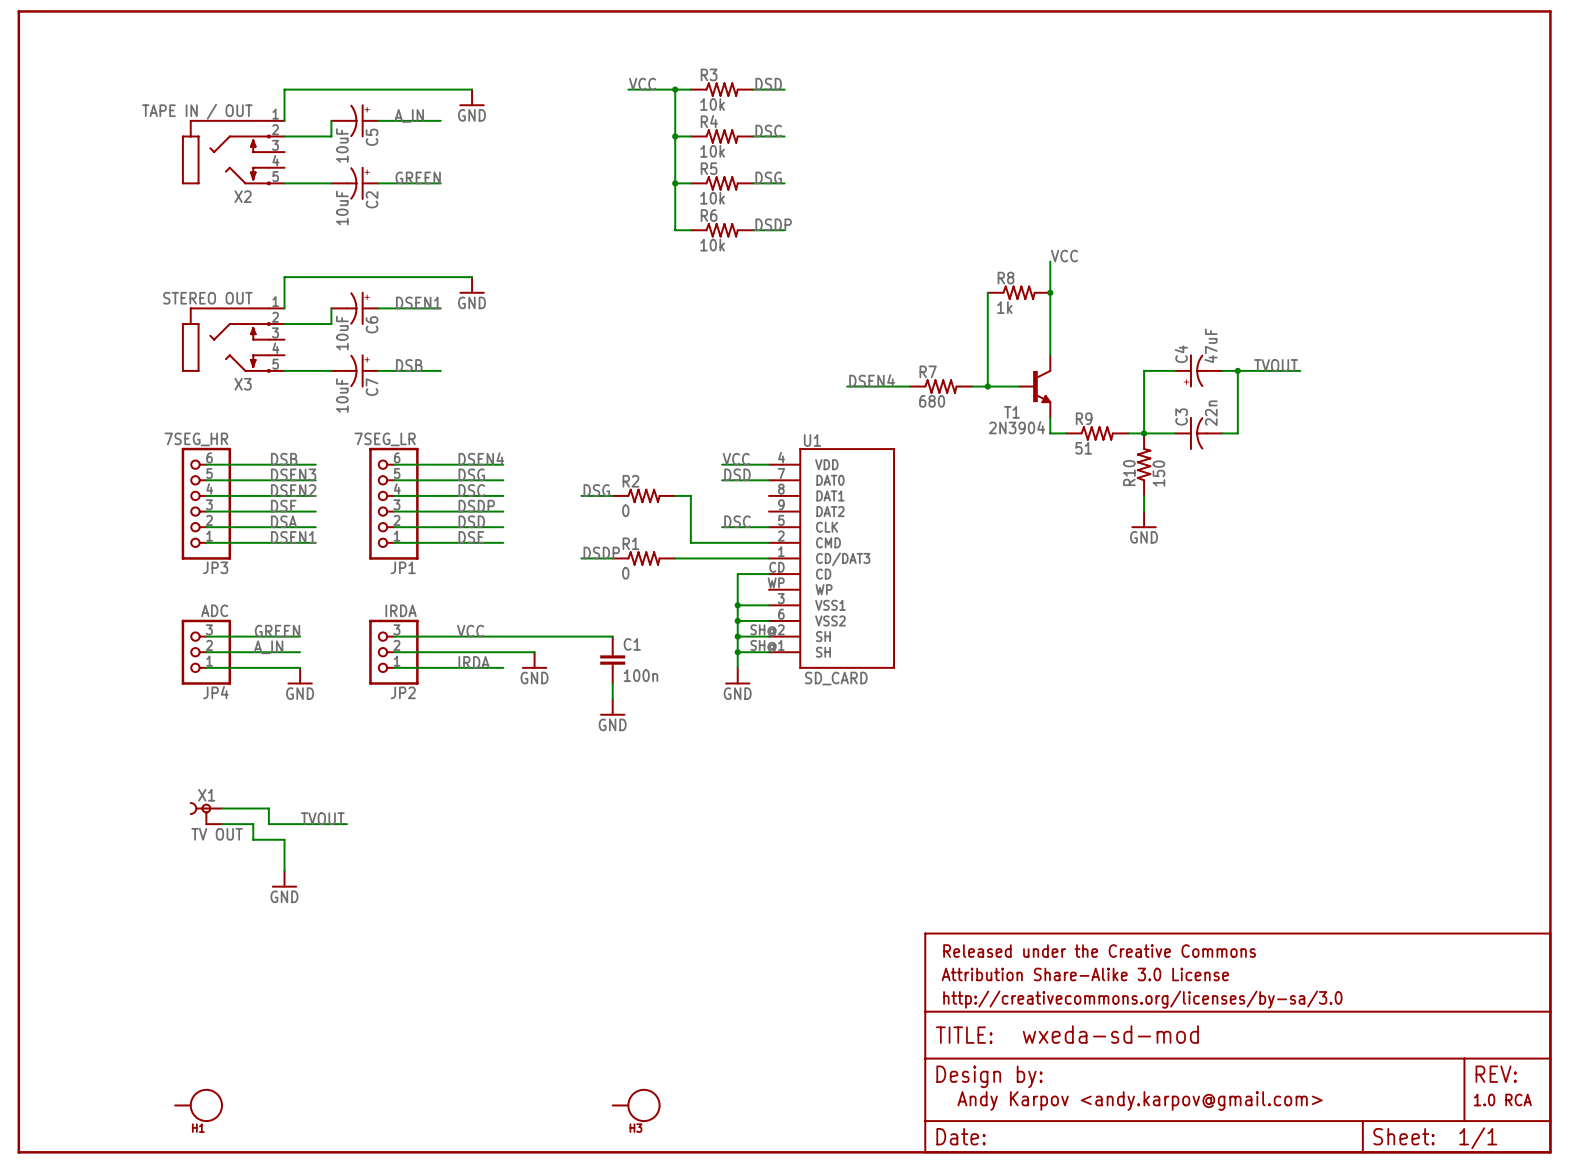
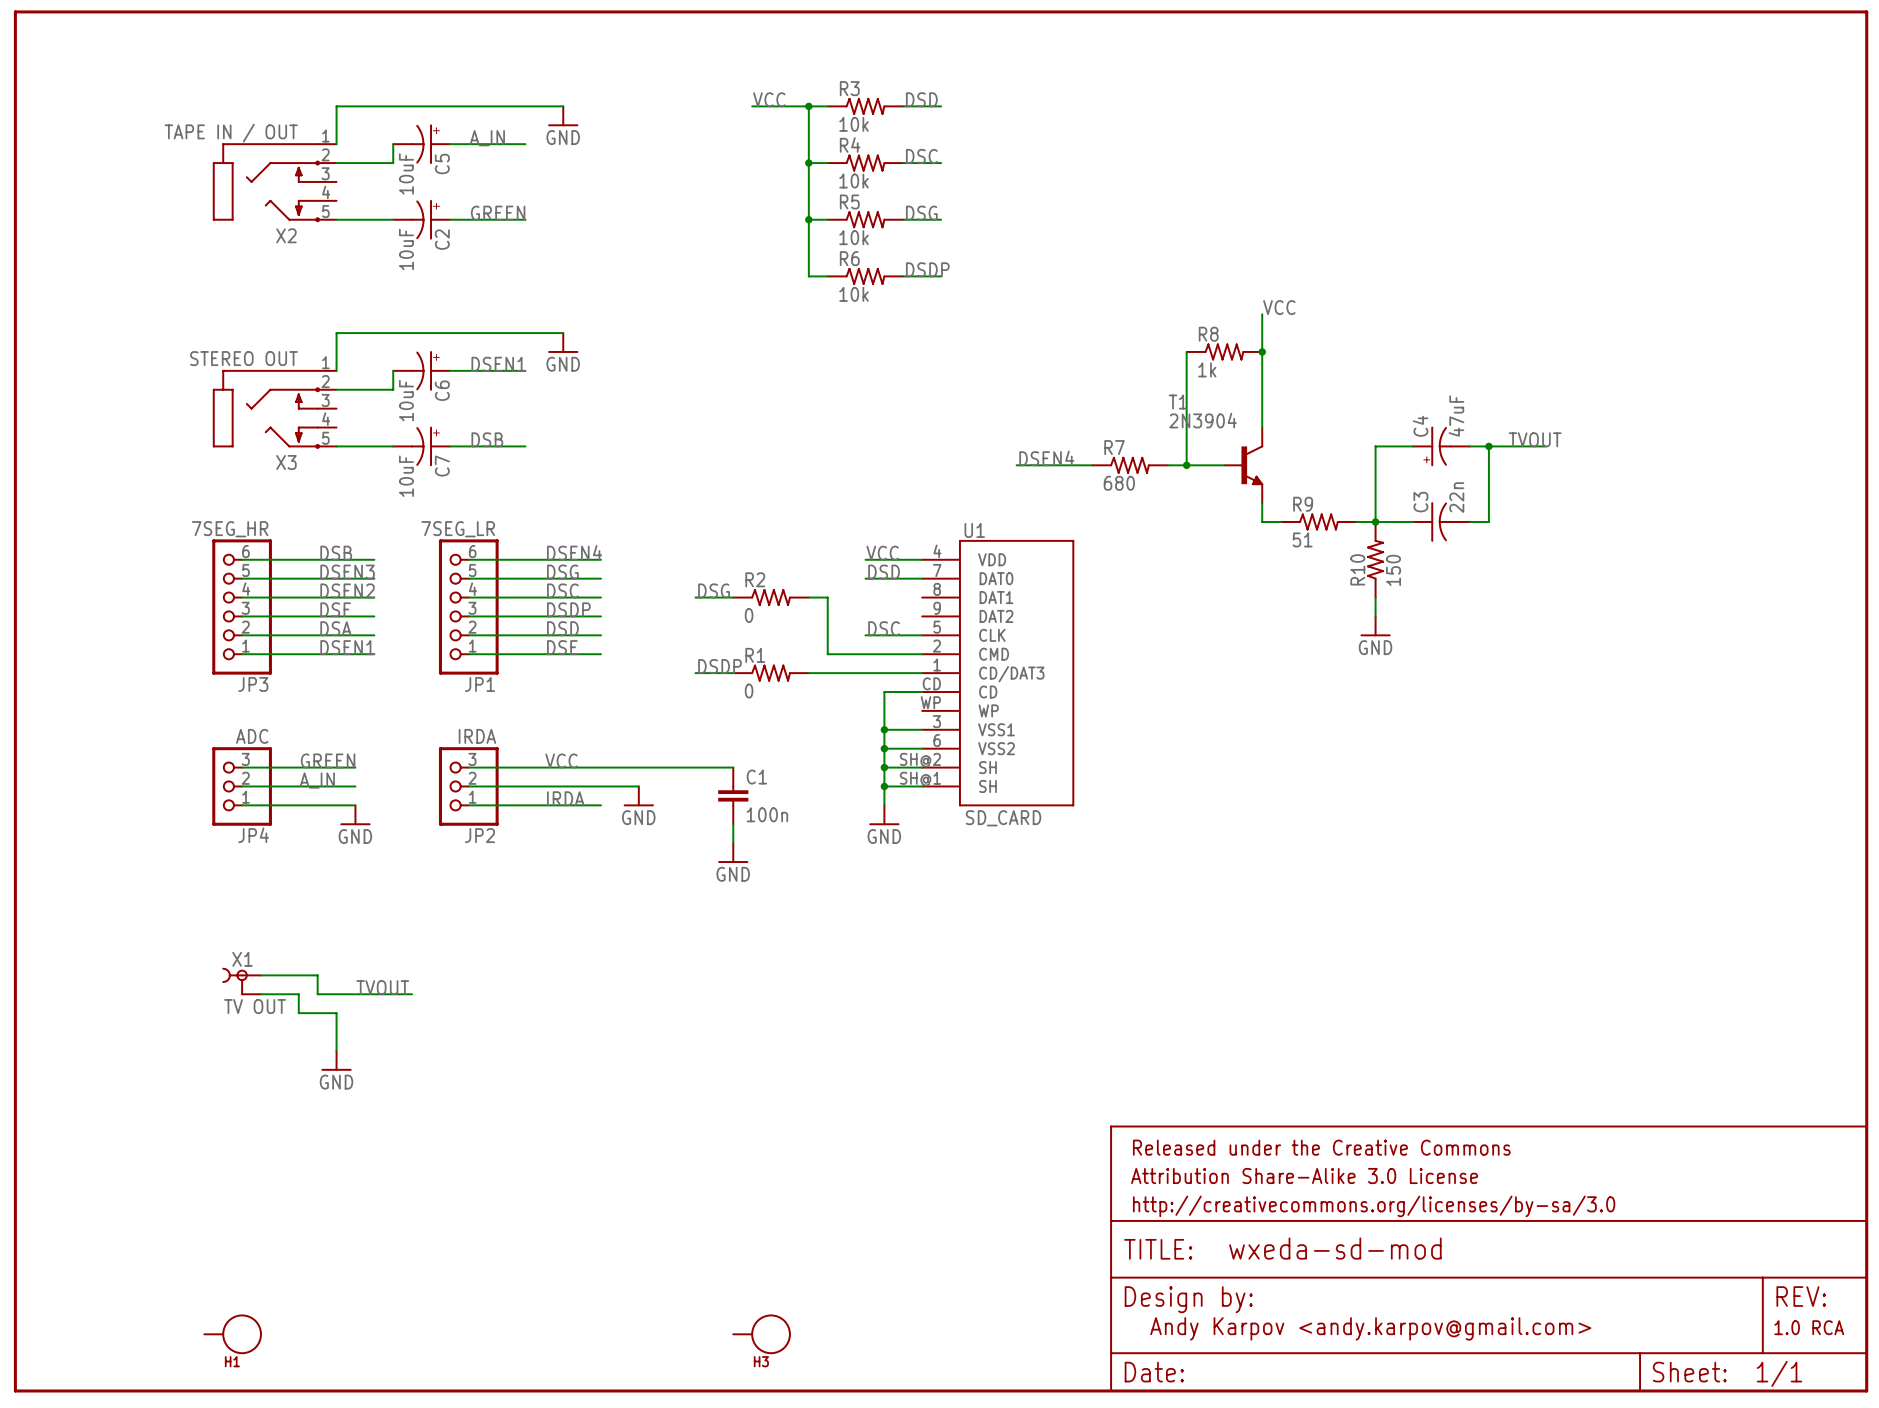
wire: (1284, 370) (1300, 370) -> none
T1 name position: T1 (1011, 412) -> T1 (1178, 402)
T1 value position: 2N3904 (1016, 427) -> 2N3904 (1203, 420)

